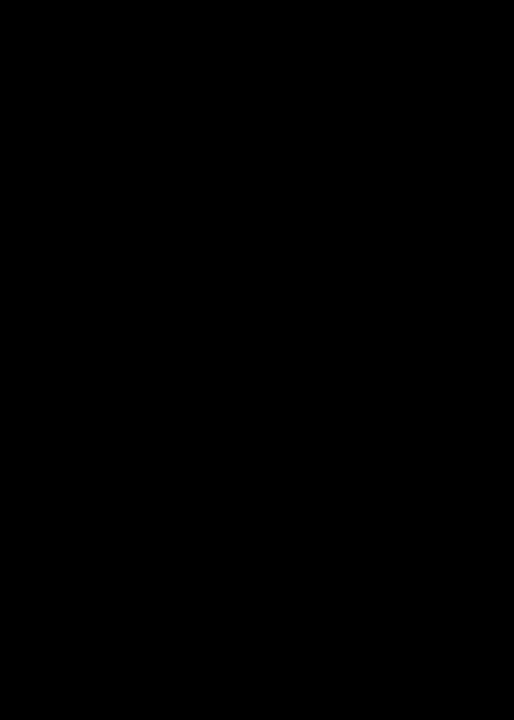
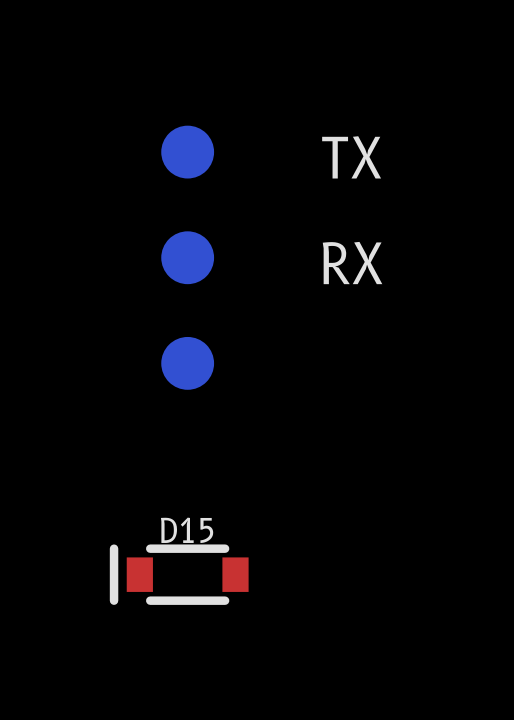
part: none -> (187, 152)
text: none -> TX (351, 157)
part: none -> (187, 257)
text: none -> RX (352, 263)
part: none -> (187, 363)
D15: none -> (179, 574)

